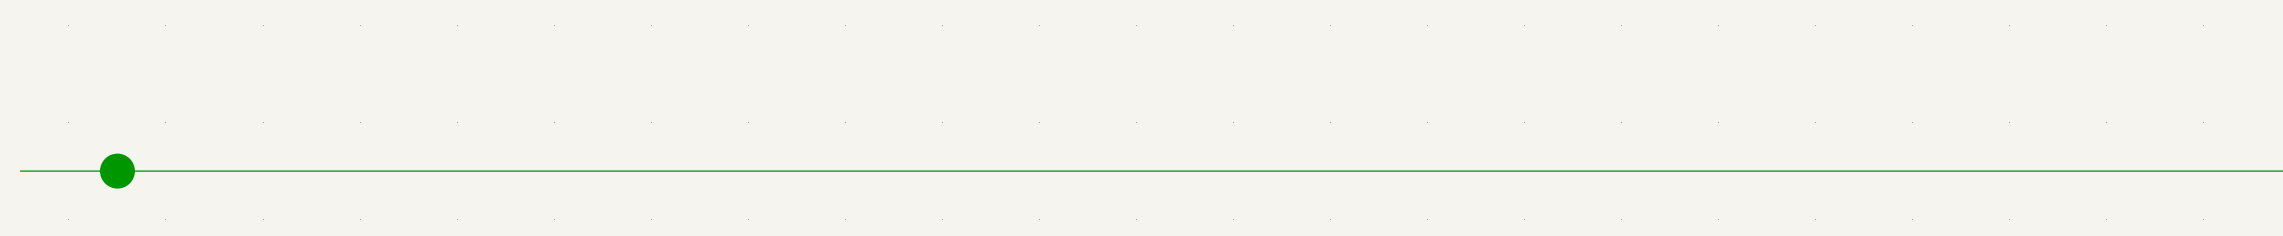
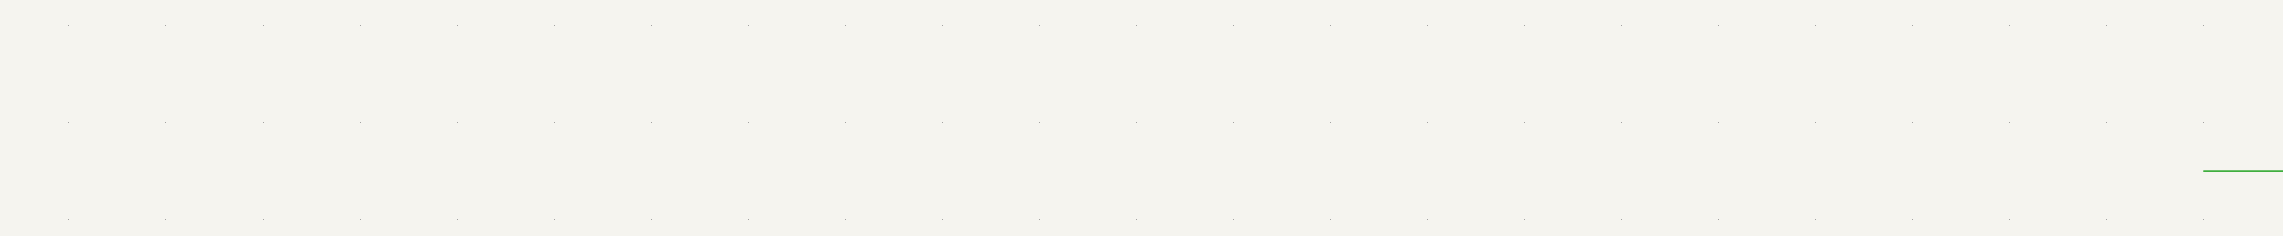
wire: (20, 171) (2203, 171) -> none
junction: (117, 171) -> none

